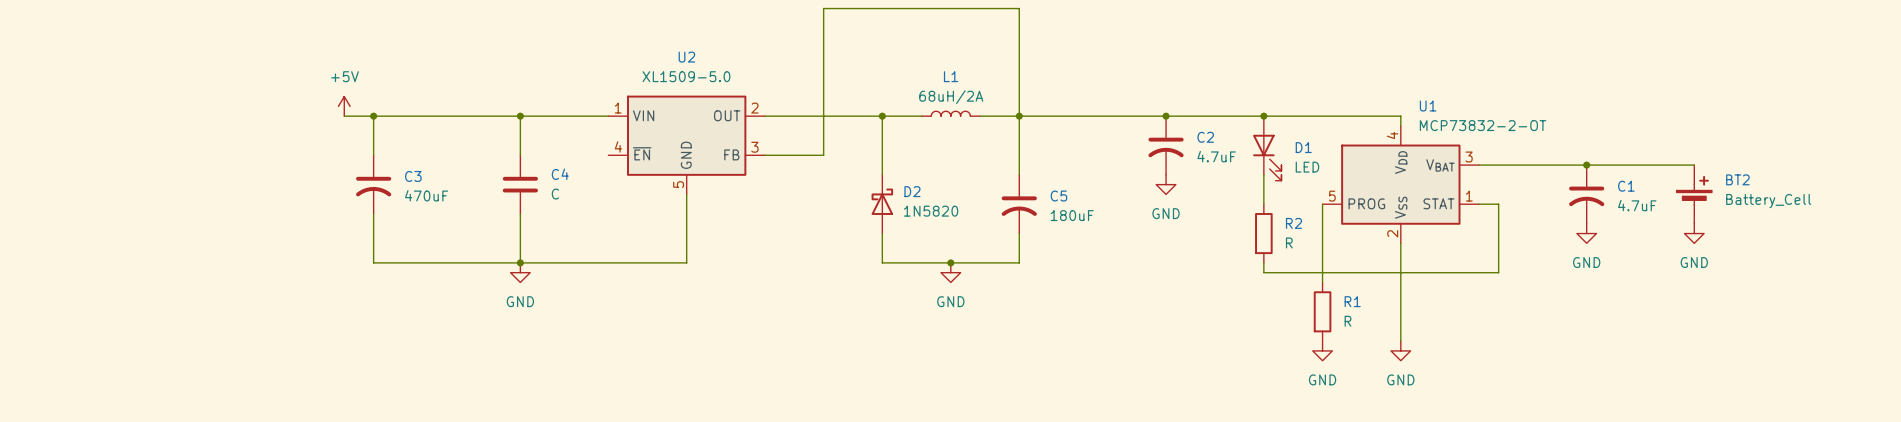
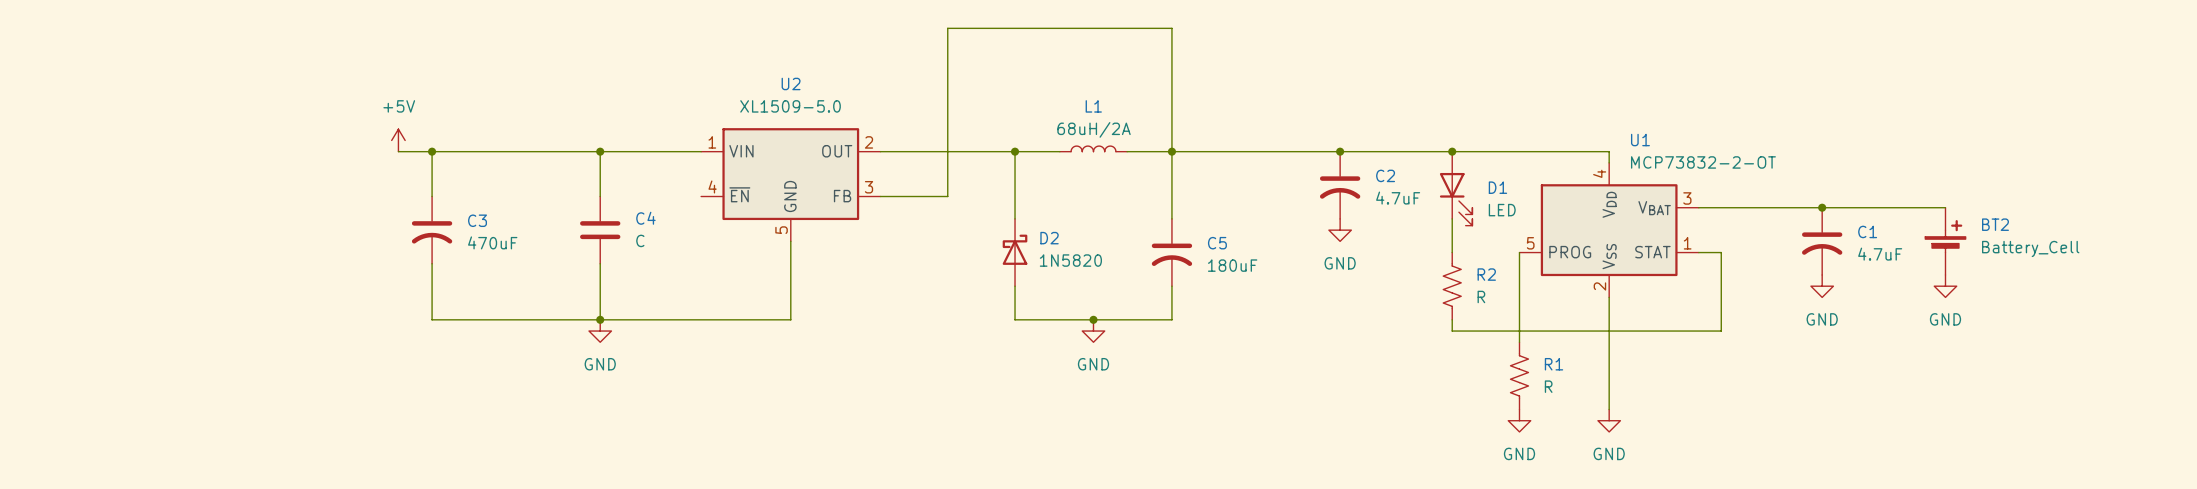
R2 symbol: [1255, 204, 1273, 263] -> [1443, 252, 1462, 320]
R1 symbol: [1313, 282, 1332, 342] -> [1510, 342, 1529, 410]

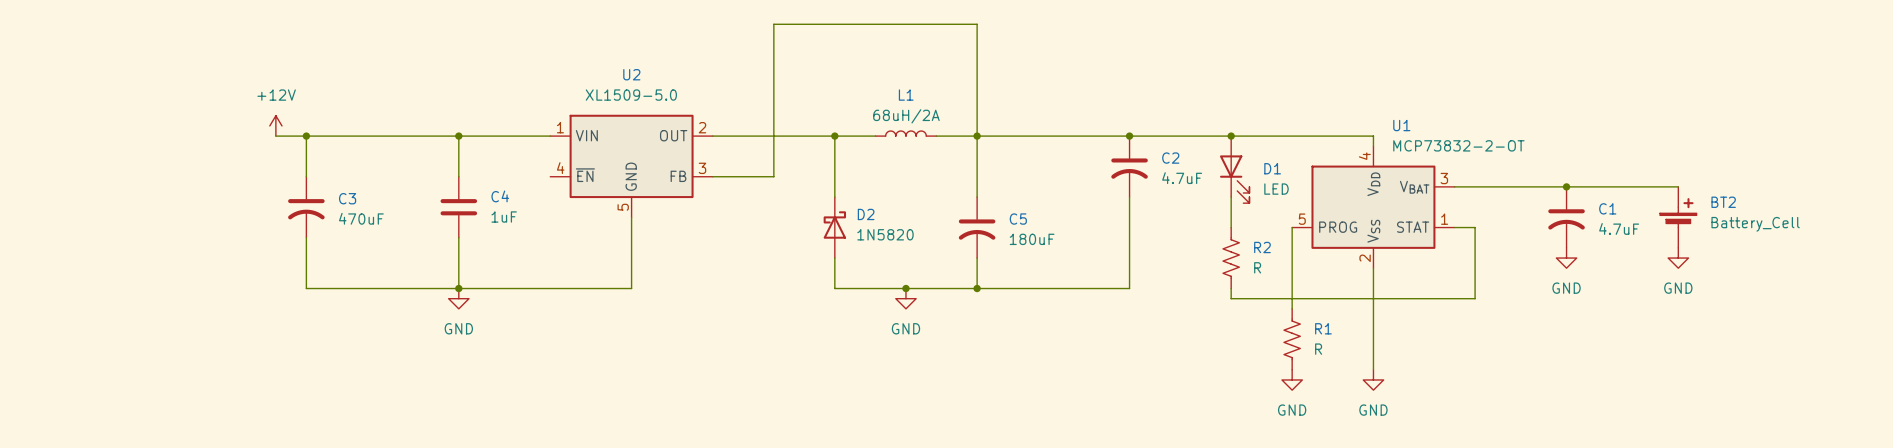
power symbol: +5V (398, 140) -> +12V (275, 125)
wire: none -> (1129, 197) (1129, 288) (977, 288)
power symbol: GND (1340, 230) -> none
C4 value: C (640, 240) -> 1uF (504, 217)
junction: none -> (977, 288)

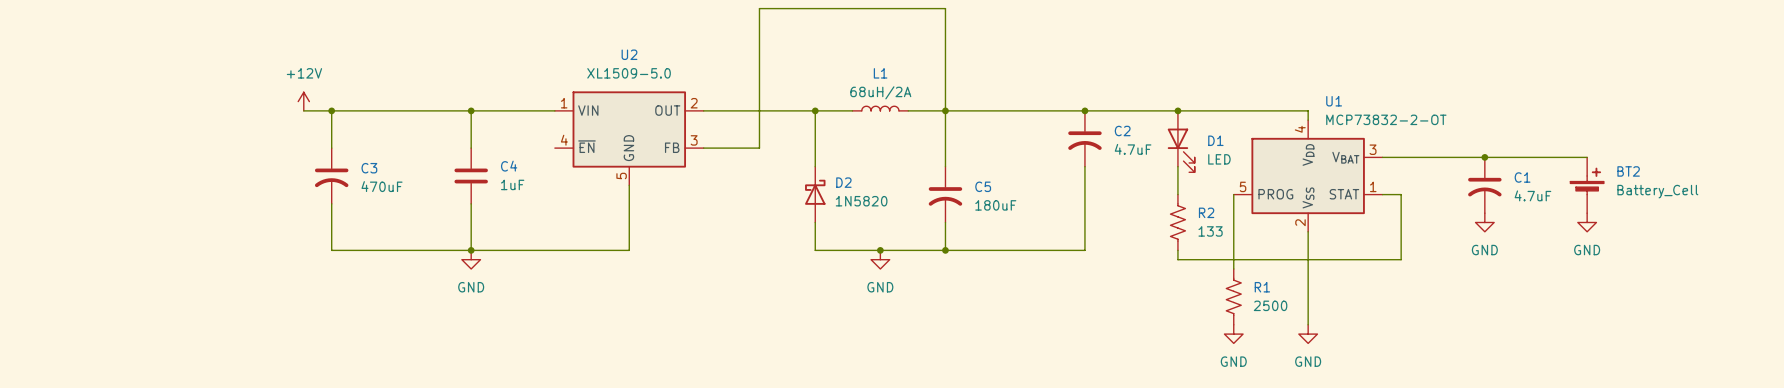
R2 value: R (1257, 267) -> 133 (1210, 231)
R1 value: R (1318, 349) -> 2500 (1270, 305)

